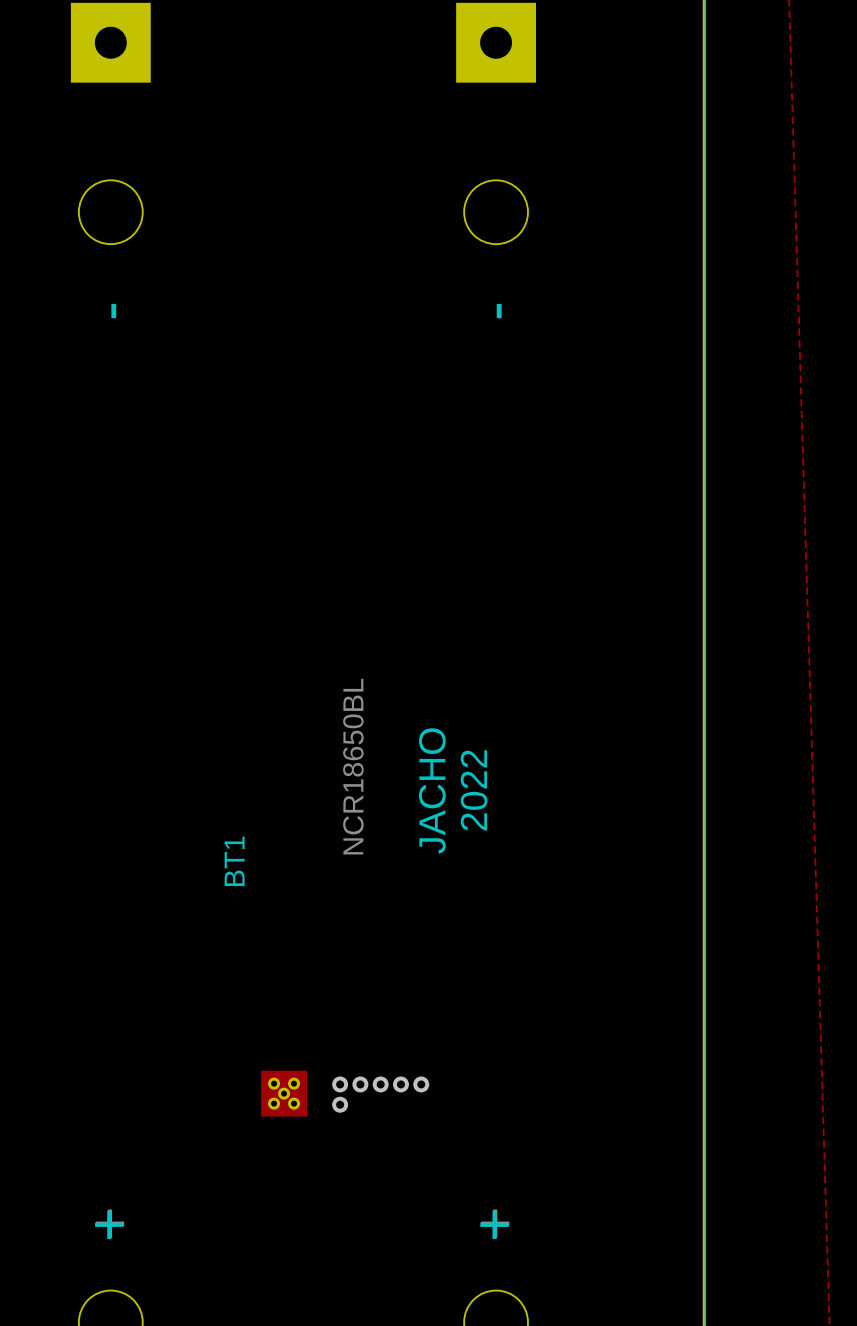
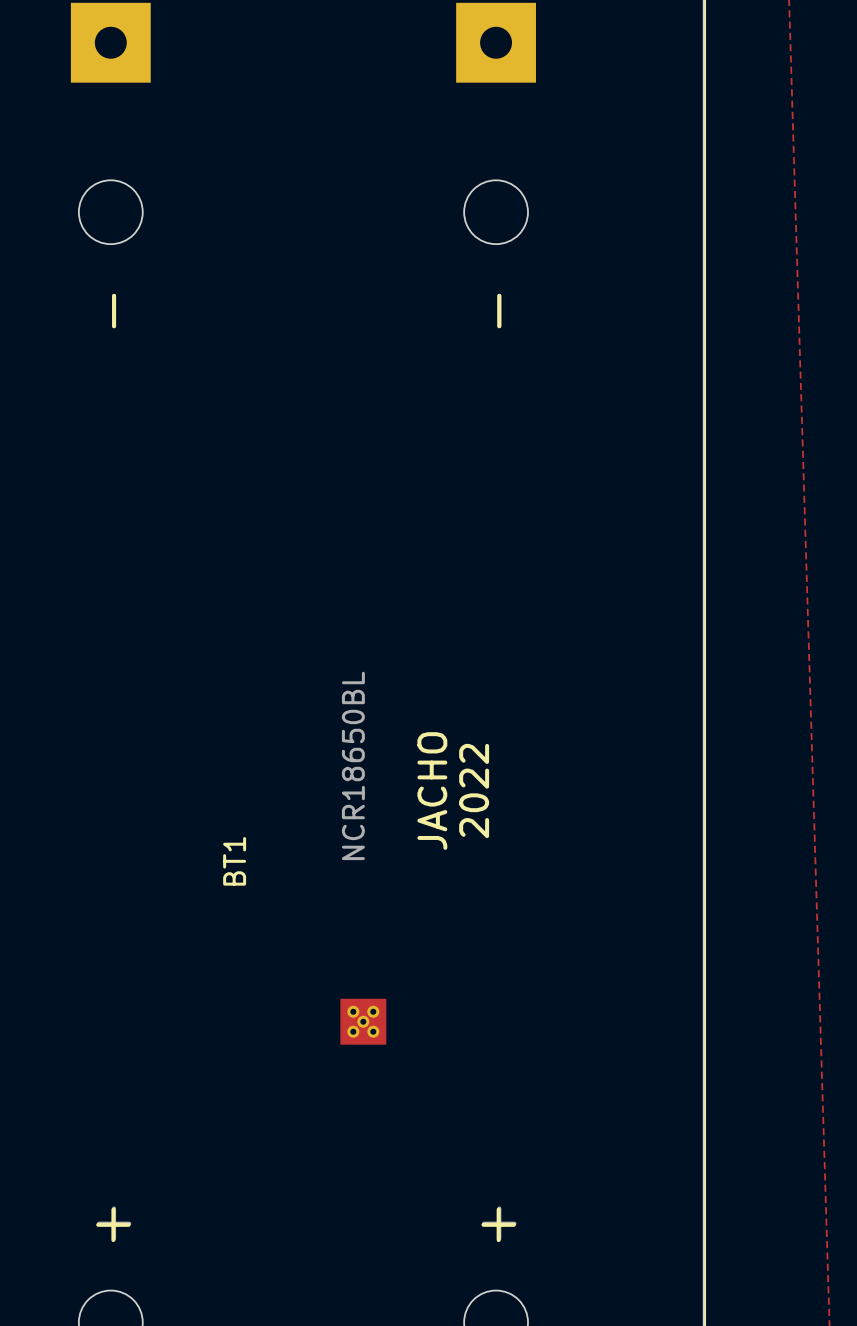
via: (340, 1084) -> none
via: (360, 1084) -> none
via: (380, 1084) -> none
via: (400, 1084) -> none
via: (421, 1084) -> none
part position: (284, 1093) -> (363, 1021)
via: (340, 1104) -> none

